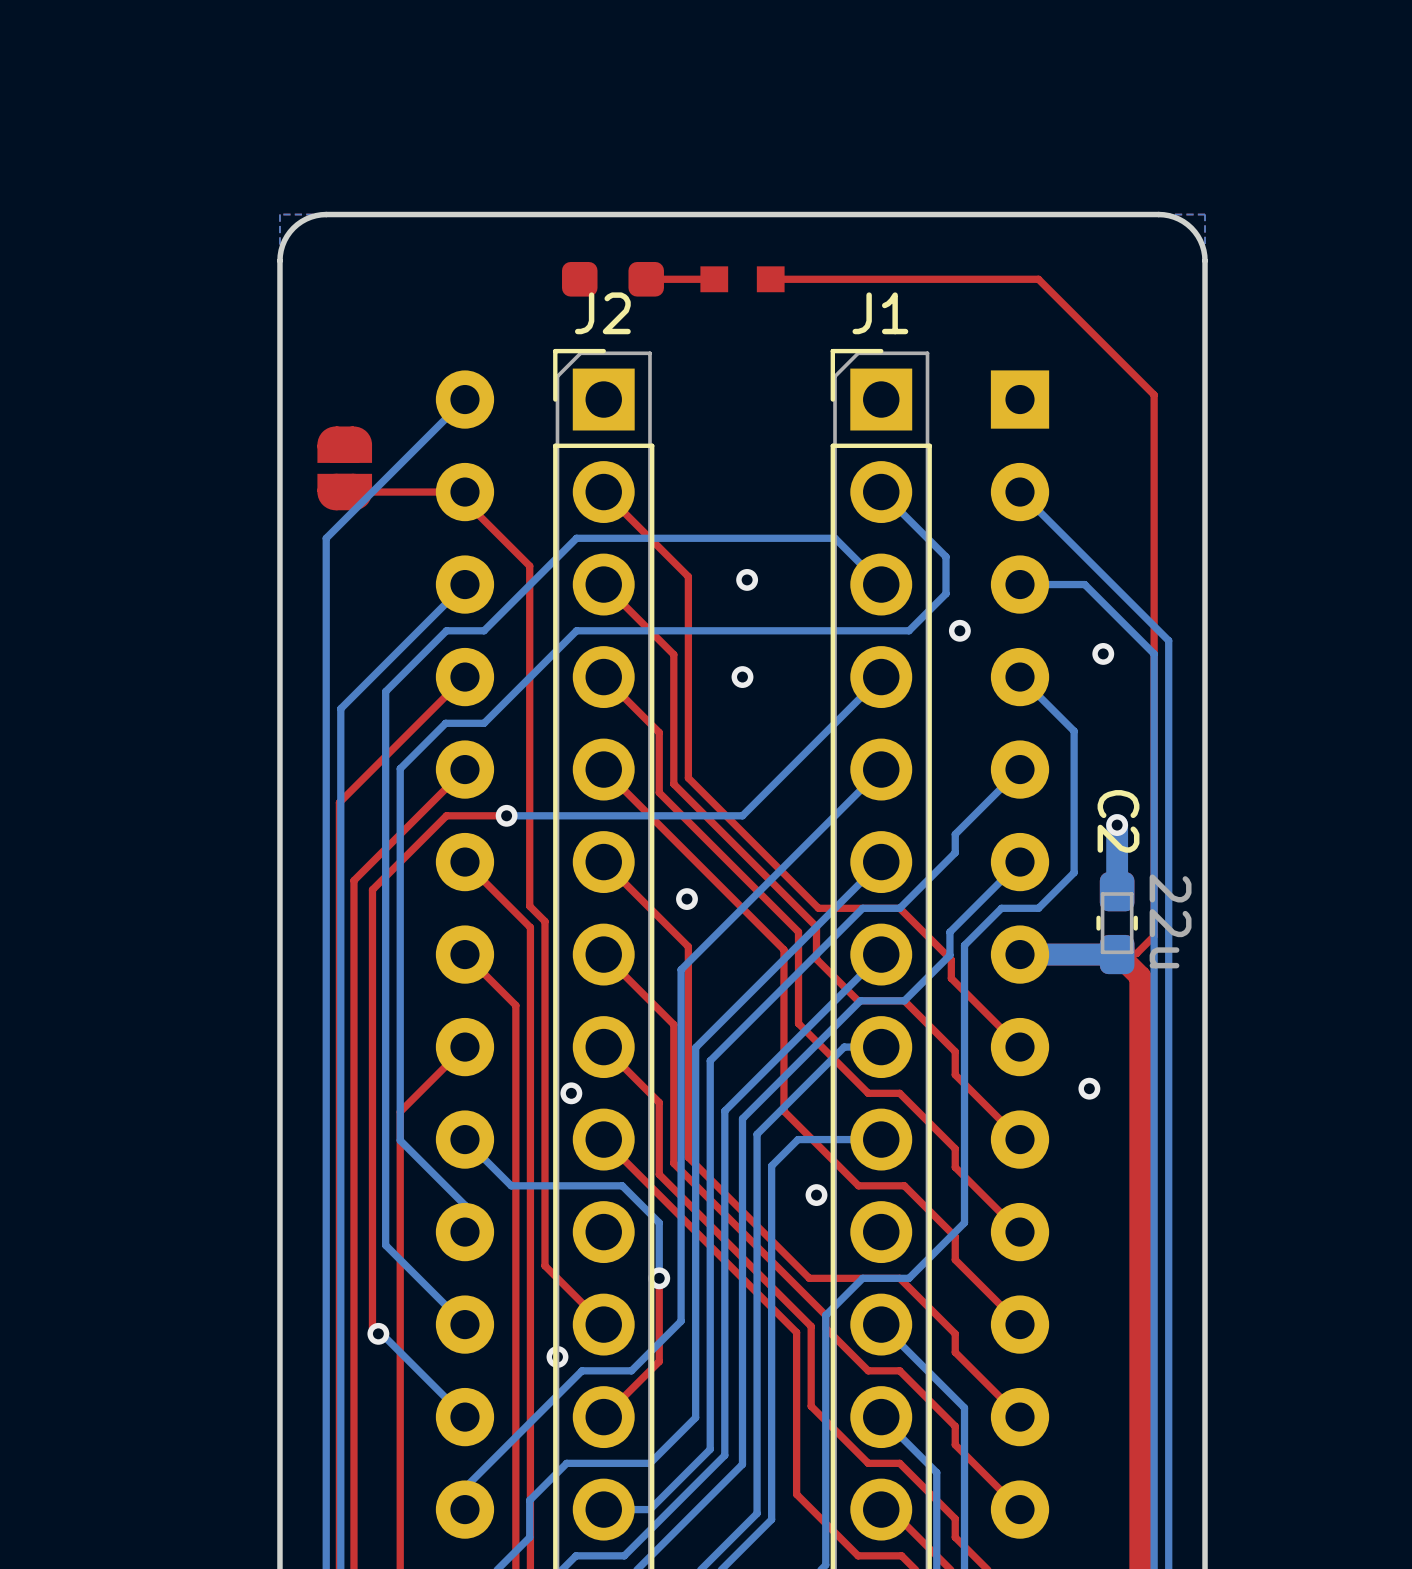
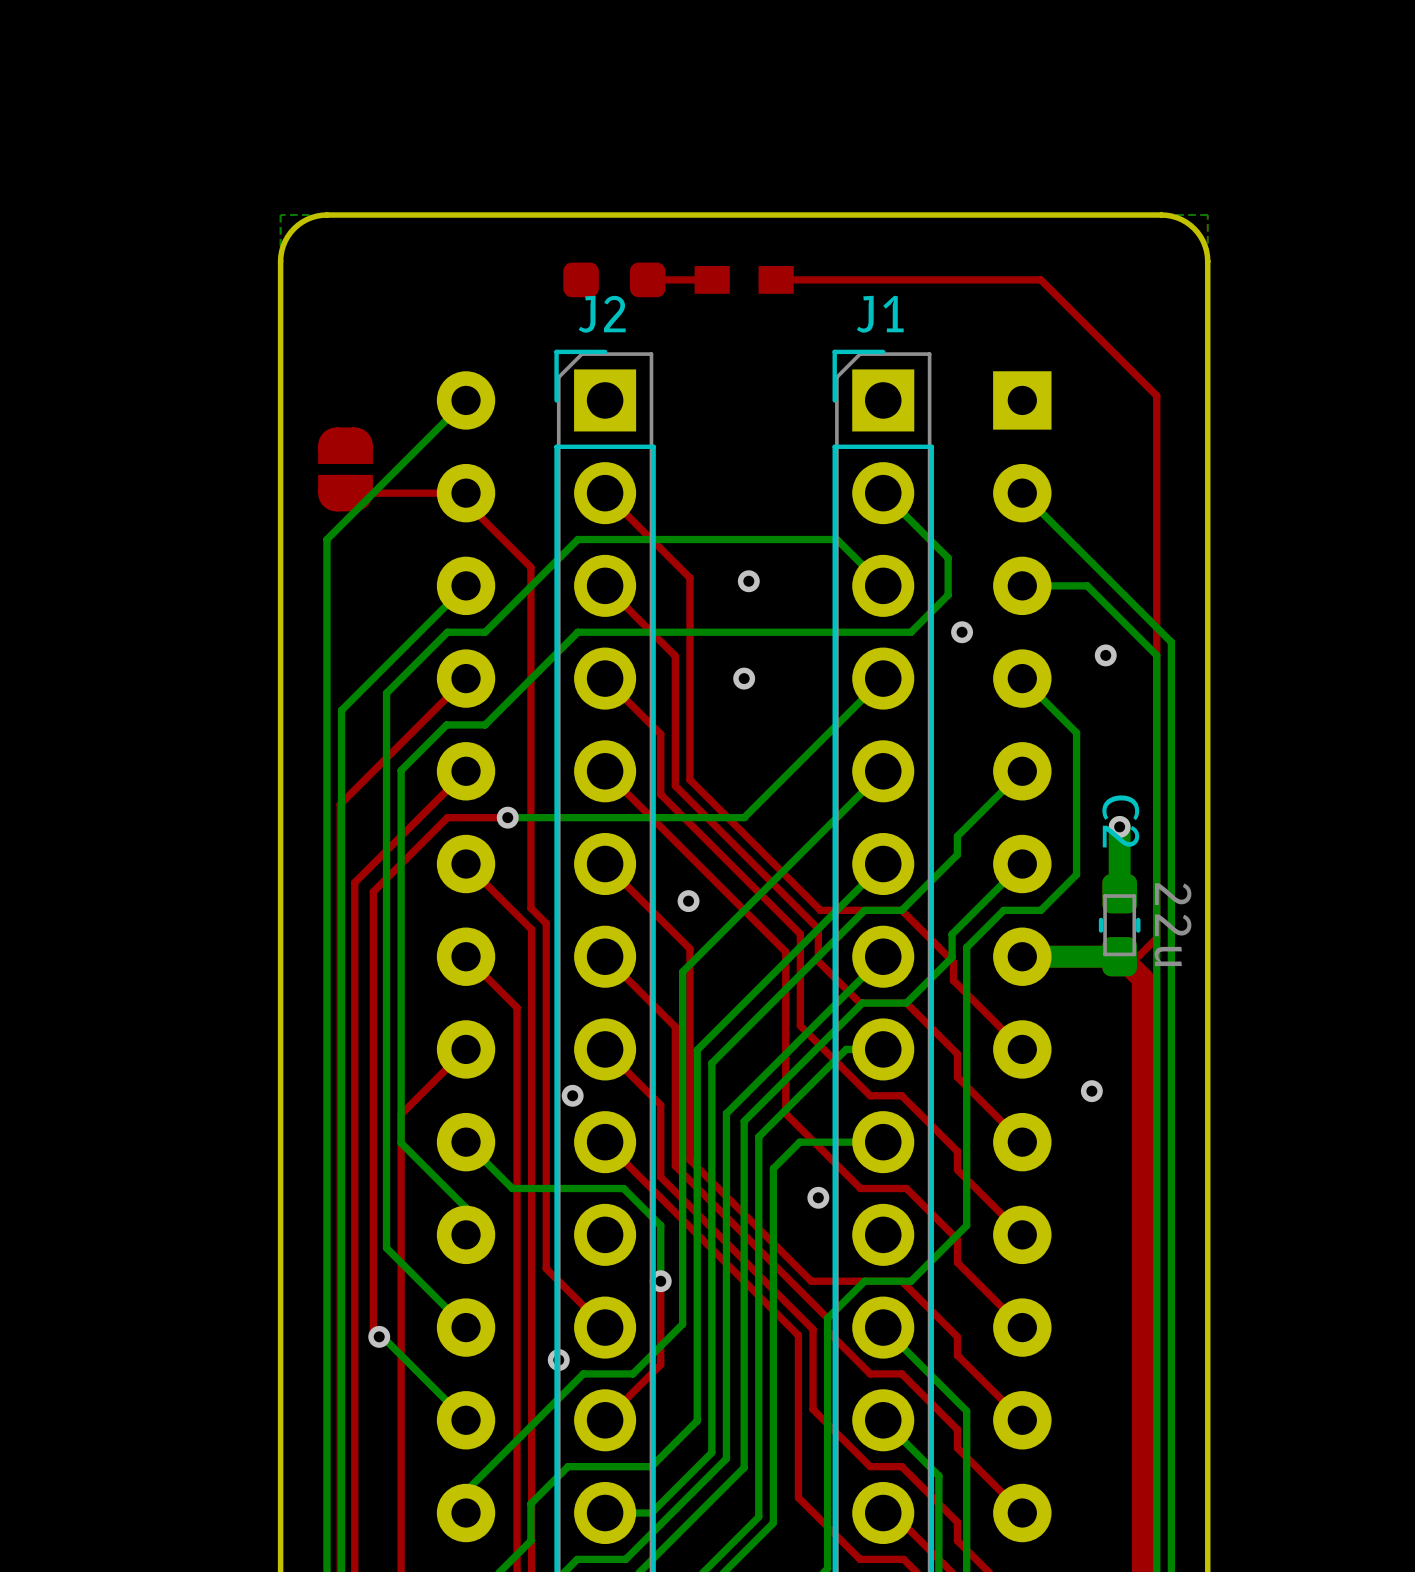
part footprint: [700, 266, 785, 293] -> [694, 266, 794, 294]

